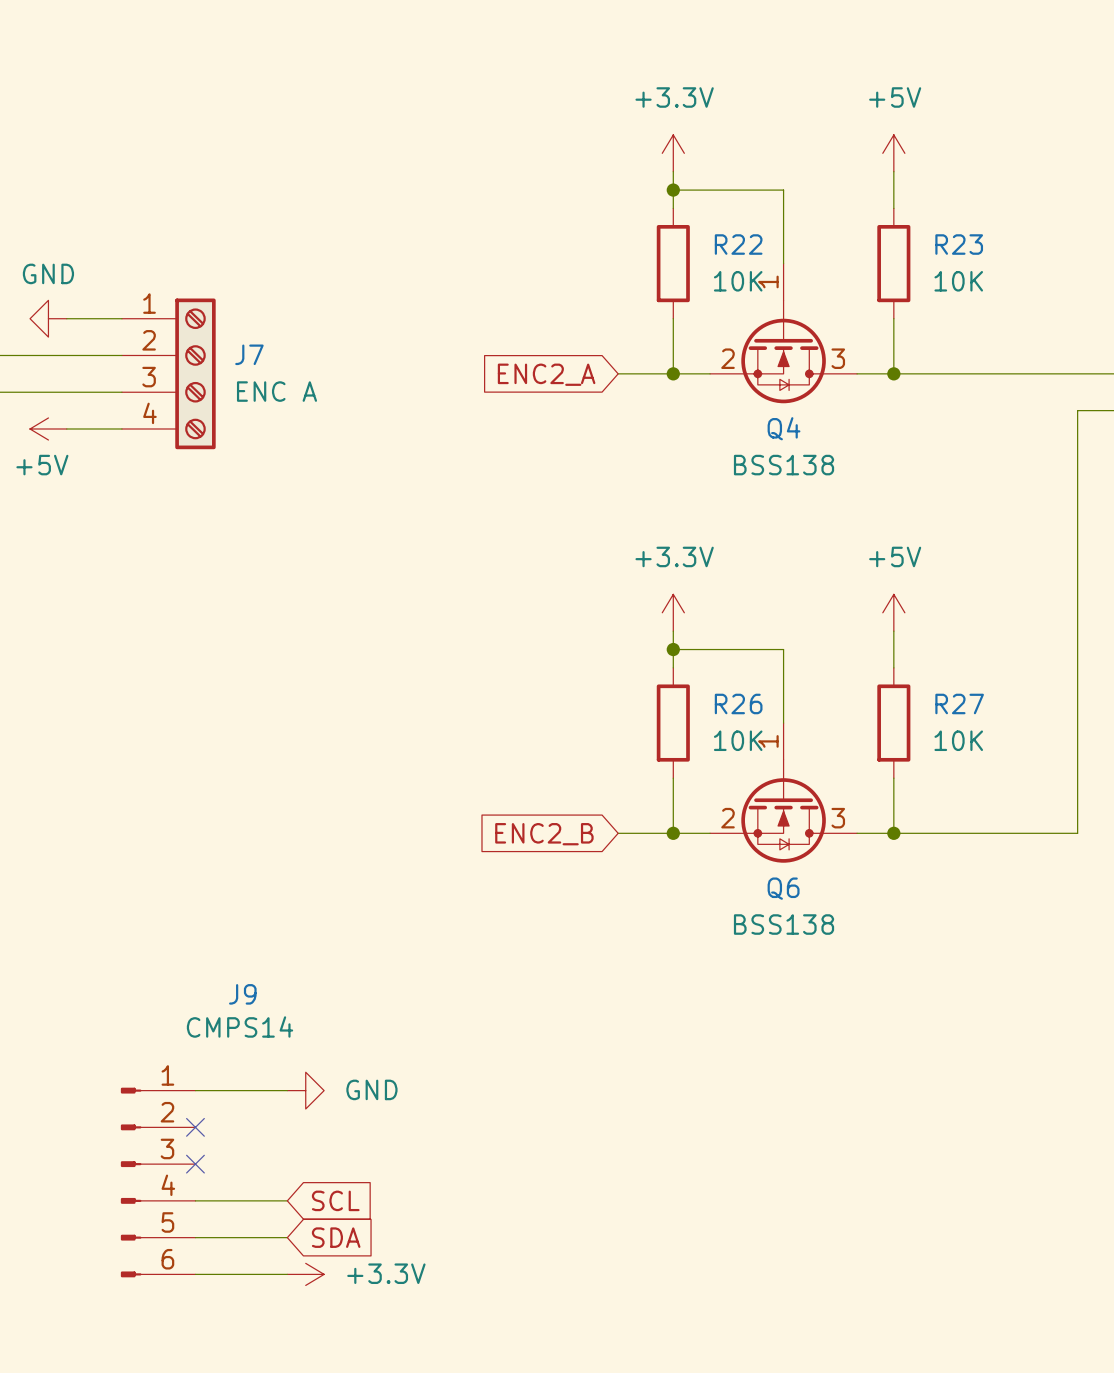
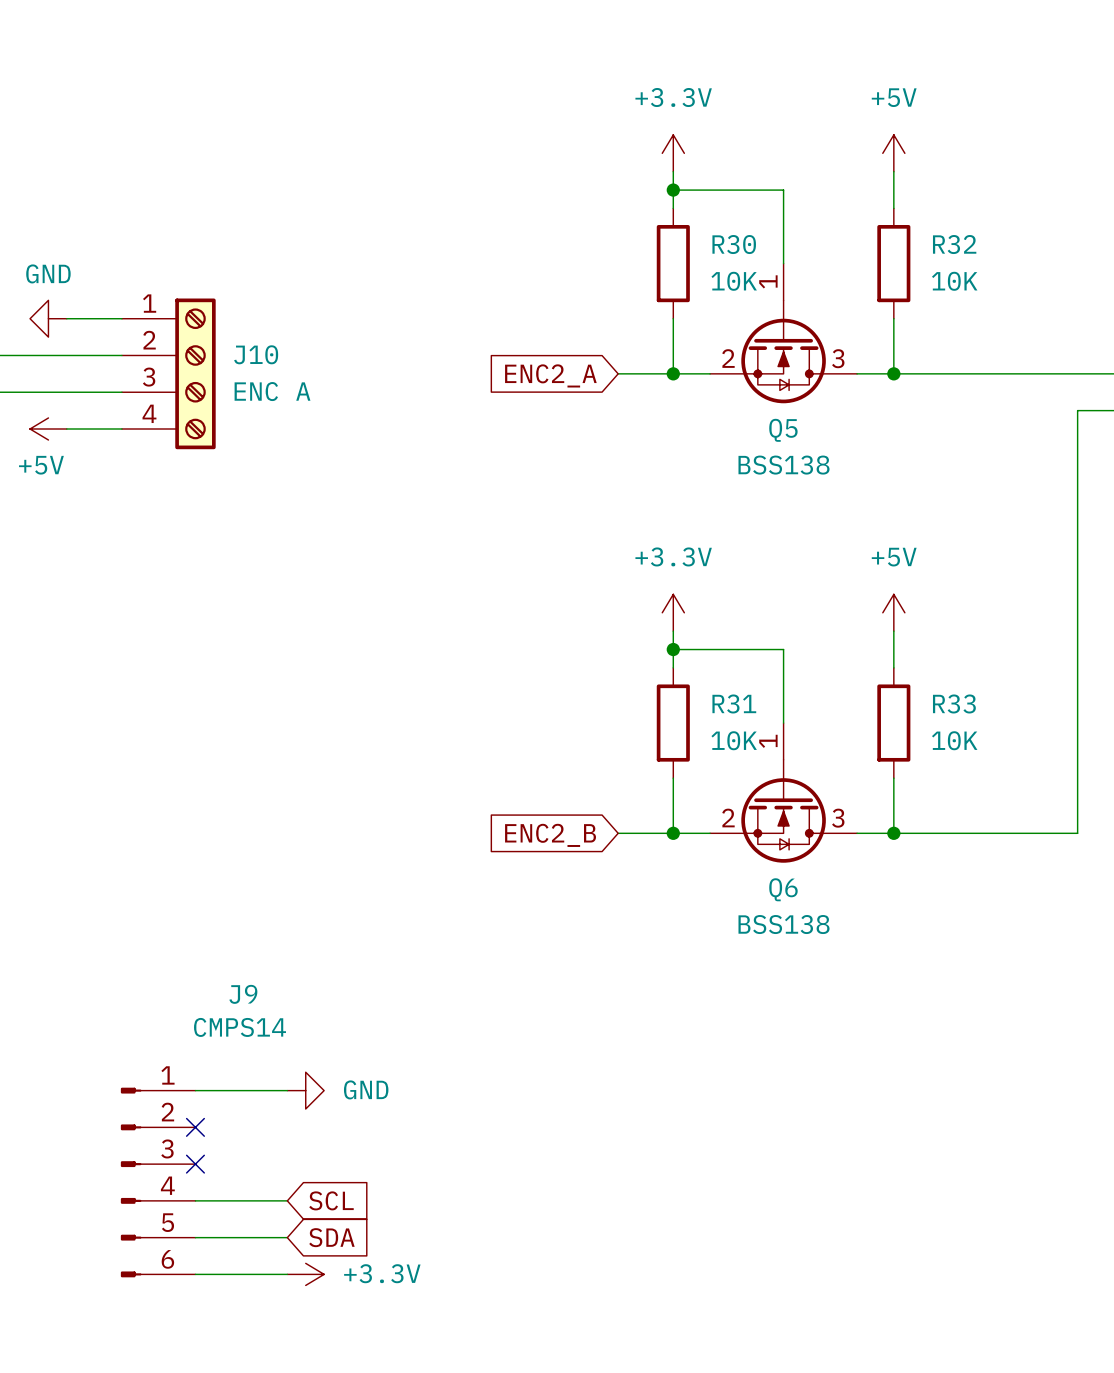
R22 name: R22 (738, 244) -> R30 (734, 244)
R23 name: R23 (959, 244) -> R32 (954, 244)
J7 name: J7 (249, 354) -> J10 (256, 354)
Q4 name: Q4 (784, 428) -> Q5 (783, 430)
R26 name: R26 (738, 703) -> R31 (734, 703)
R27 name: R27 (959, 703) -> R33 (954, 703)

